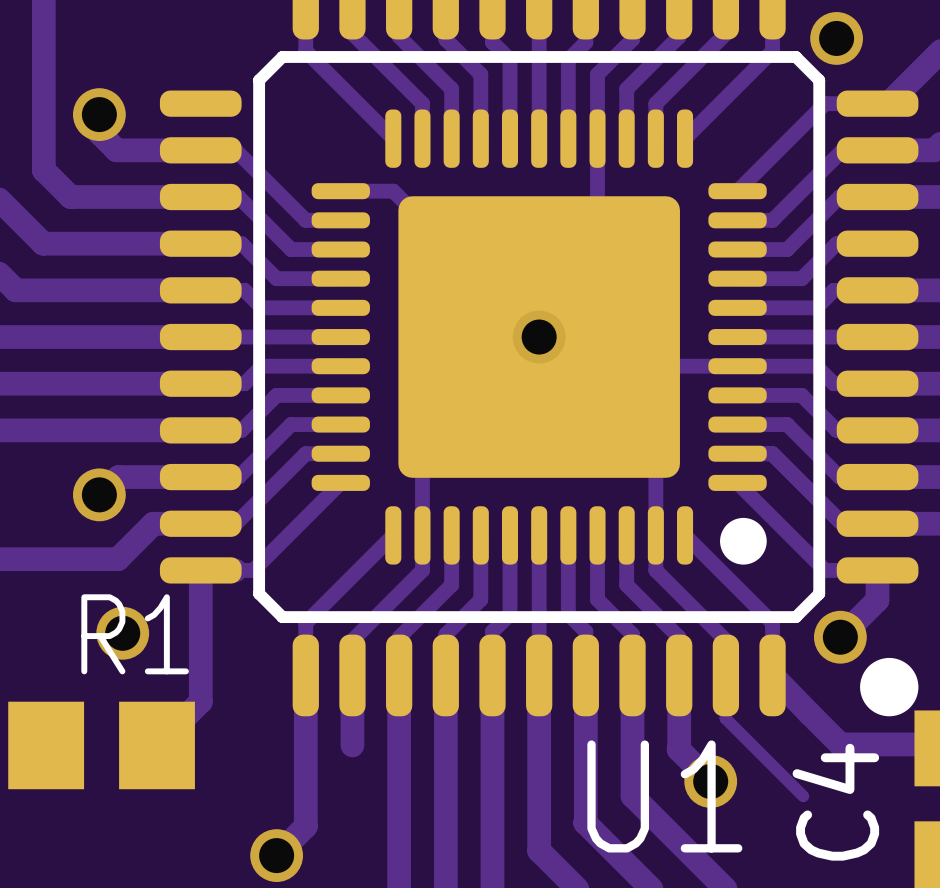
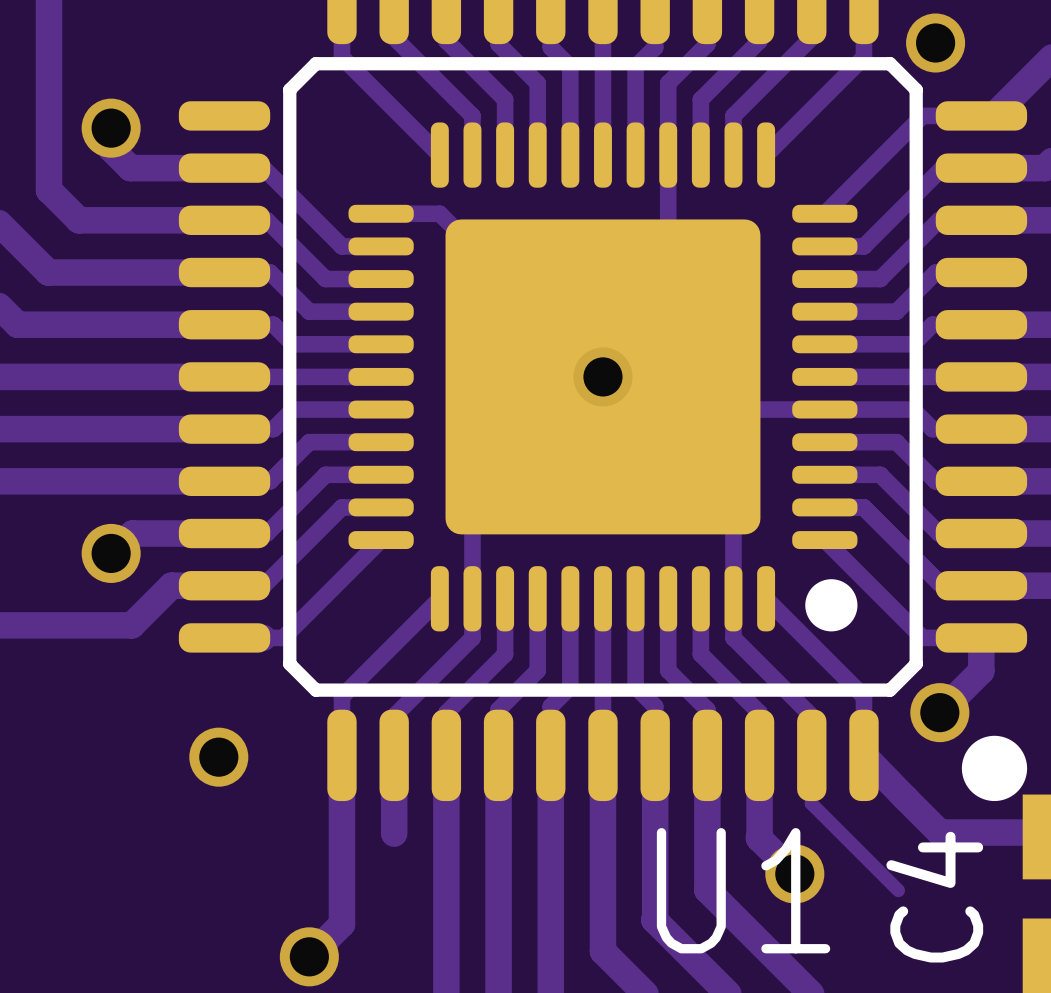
track: (200, 570) (200, 701) (157, 745) -> none
via position: (122, 633) -> (218, 757)
R1: (101, 745) -> none

